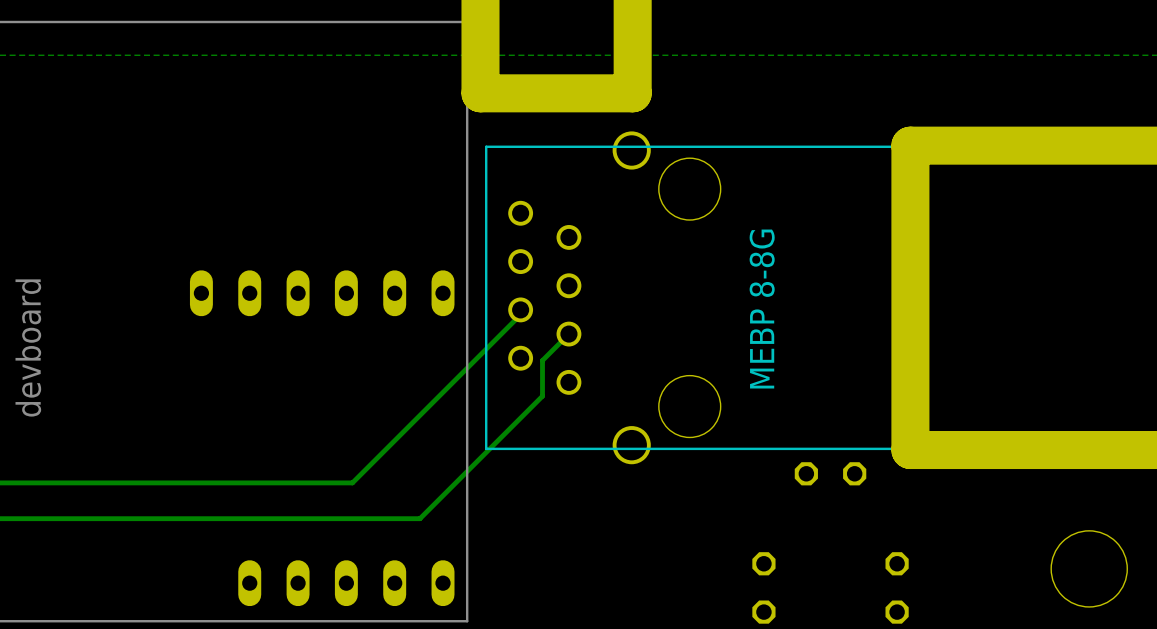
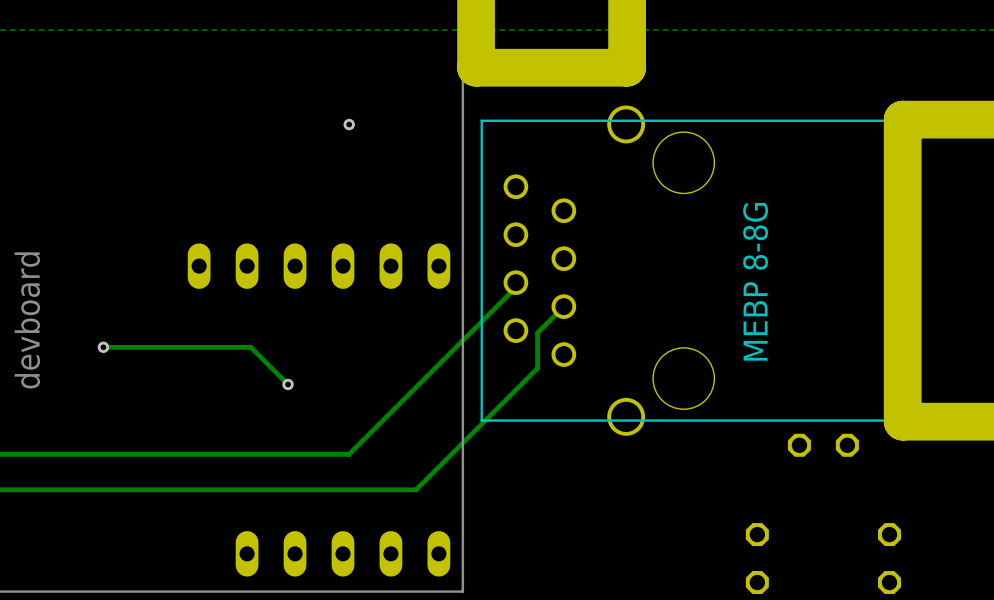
via: none -> (349, 124)
track: none -> (103, 347) (250, 347) (288, 384)
via: none -> (103, 347)
via: none -> (288, 384)

